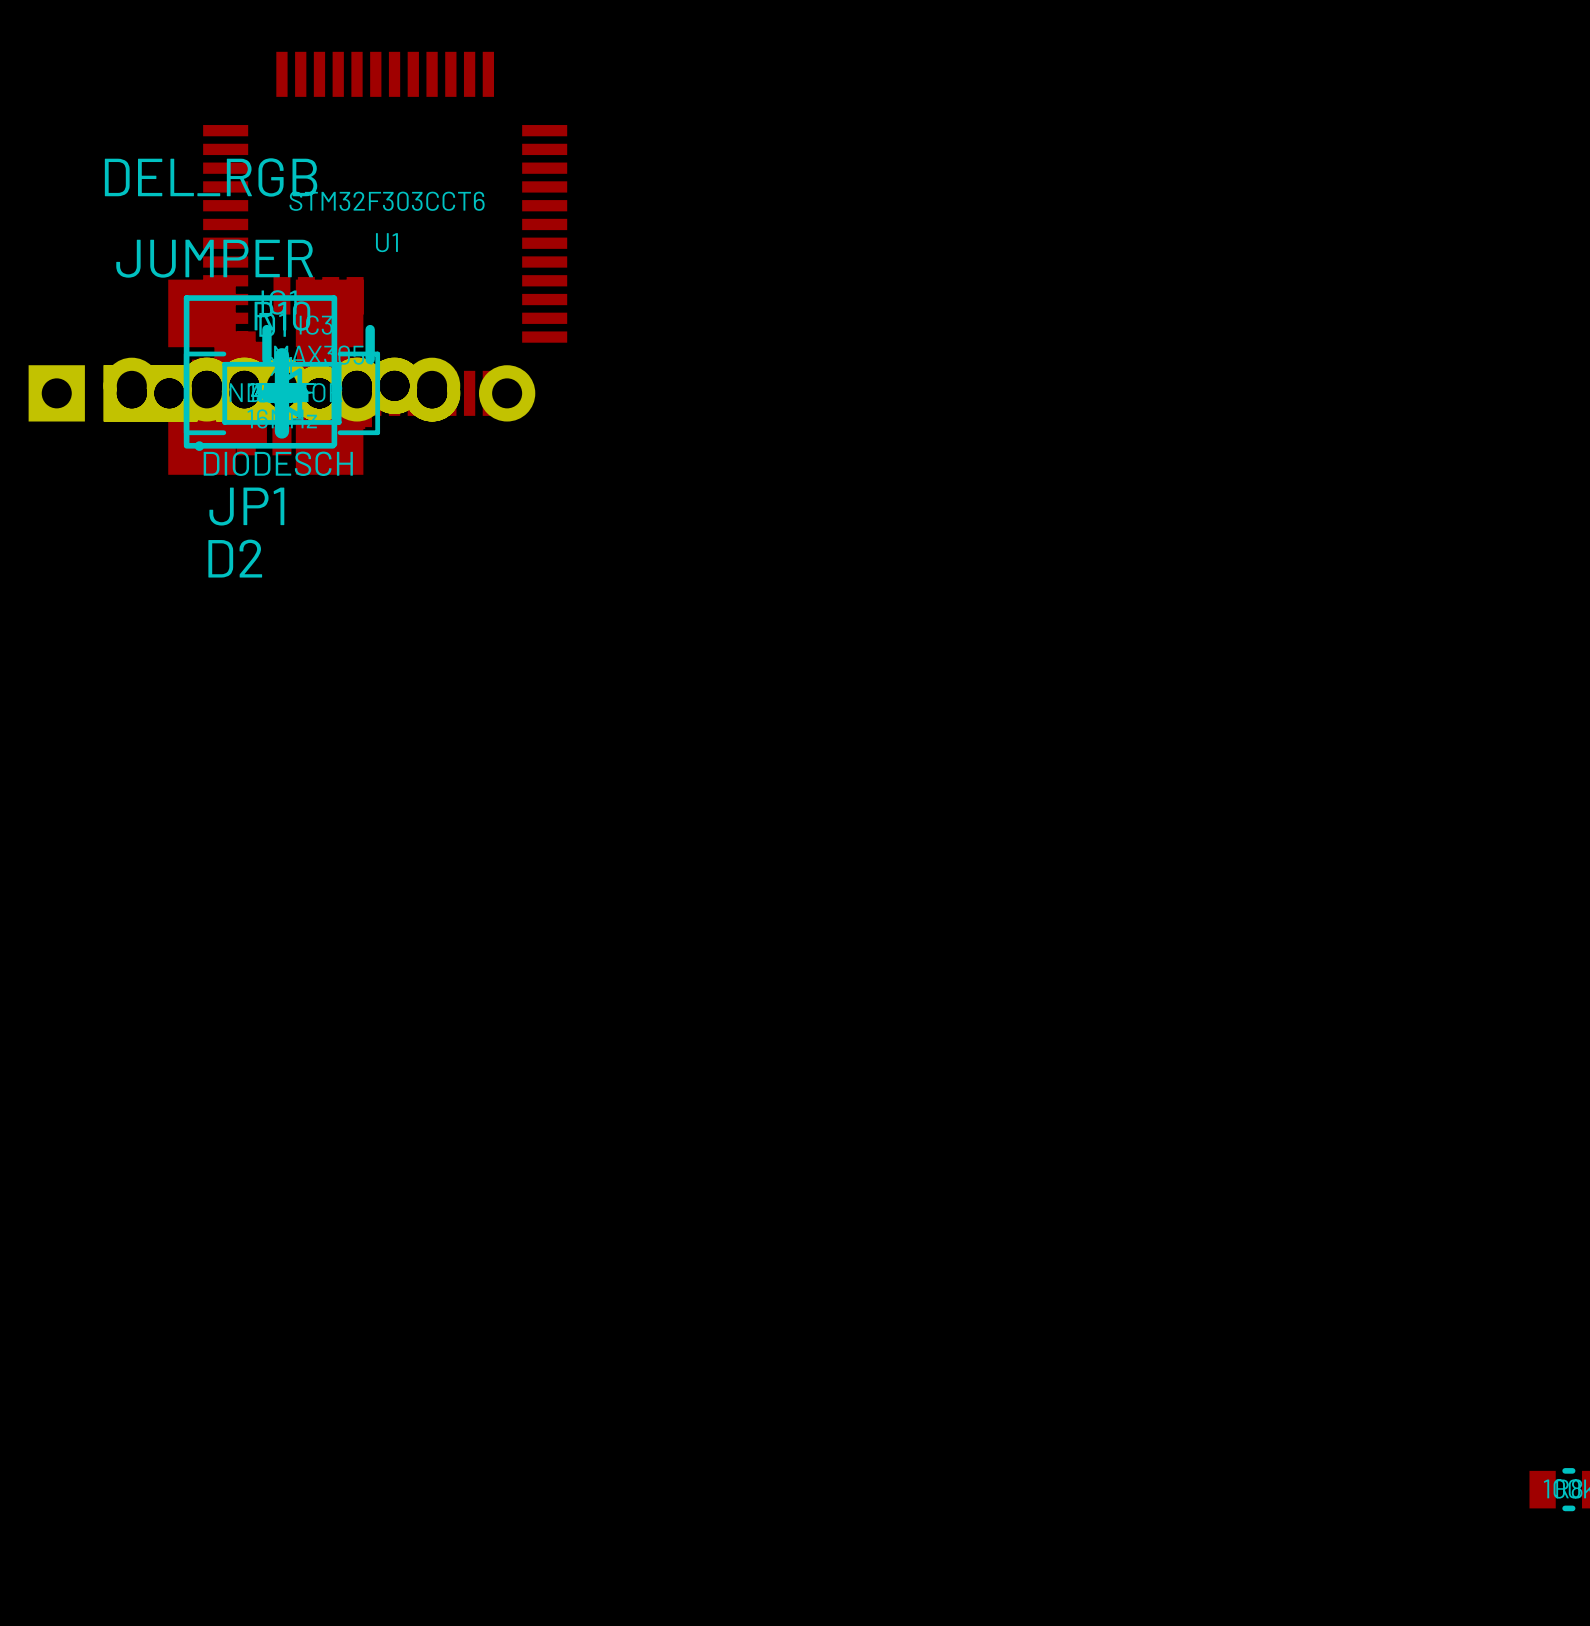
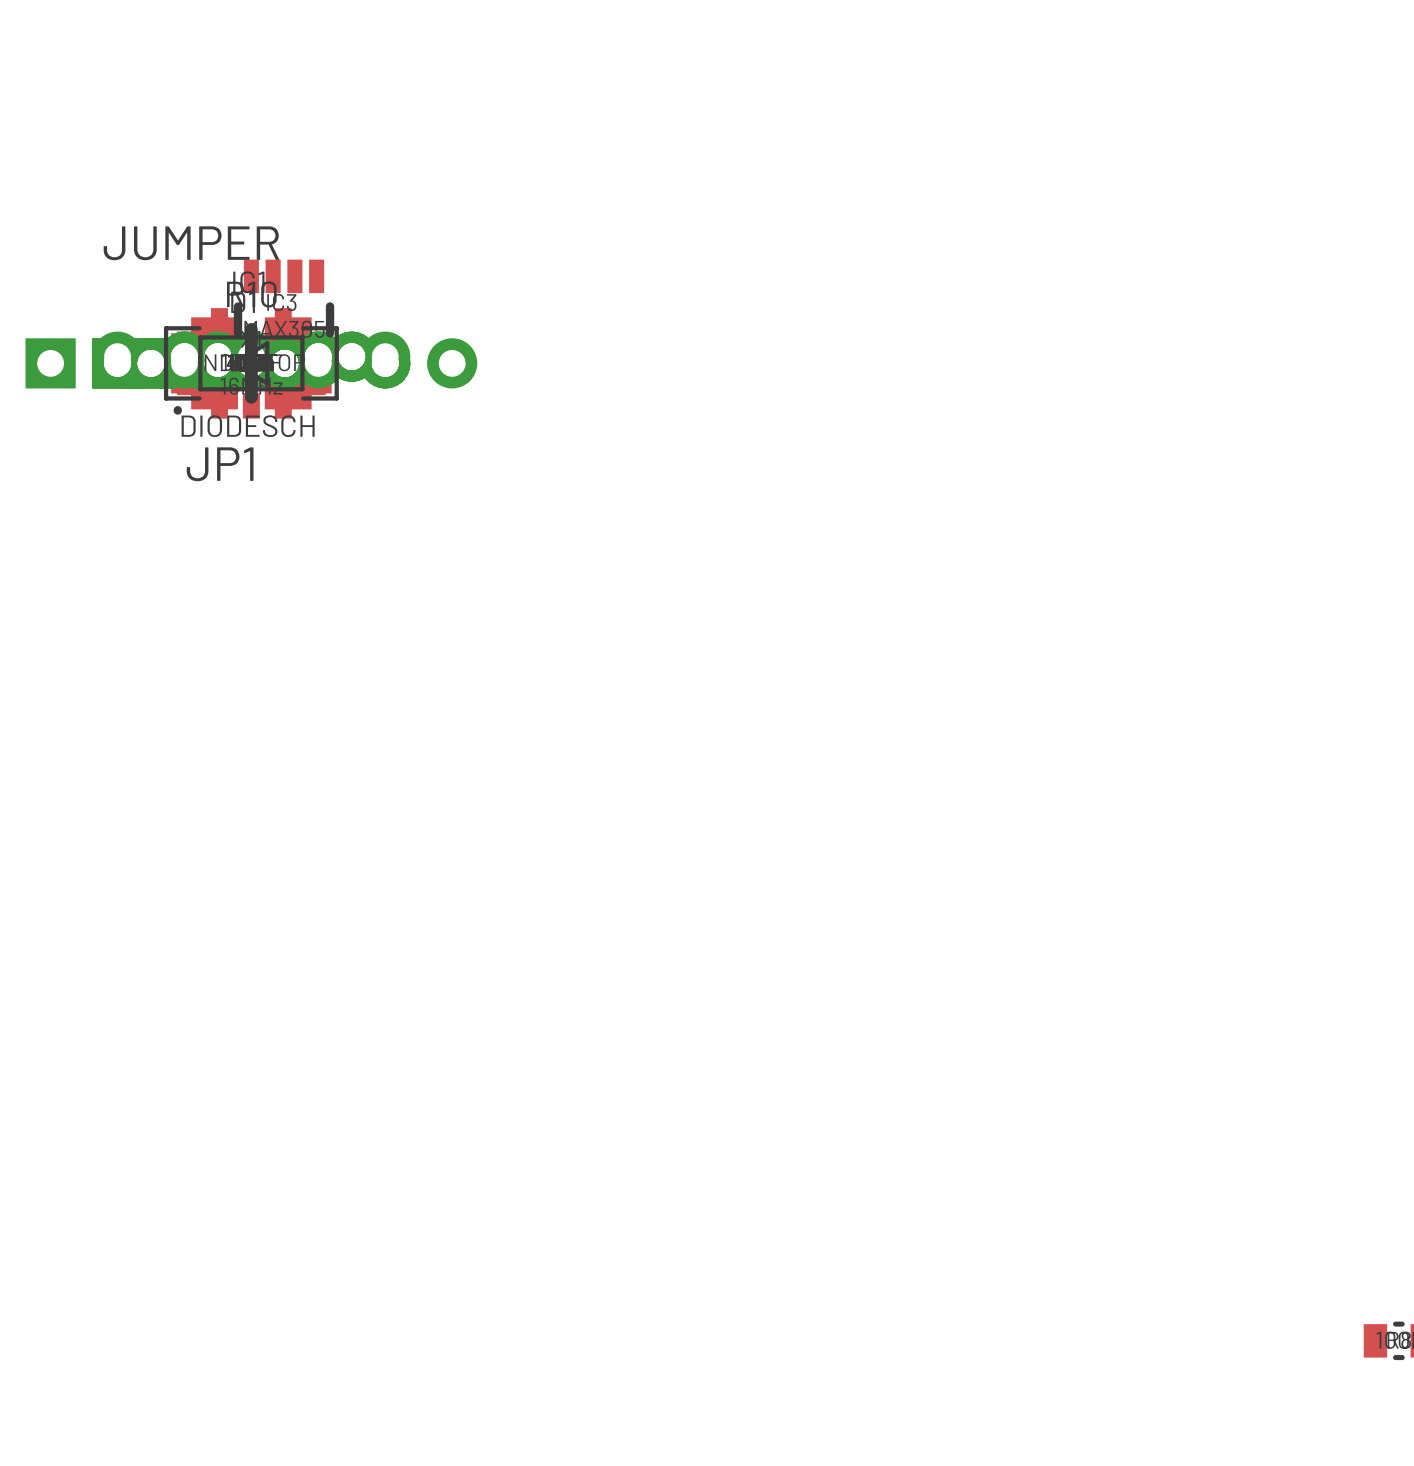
U1: STM32F303CCT6 (385, 233) -> none
D2: DEL_RGB (265, 377) -> none

